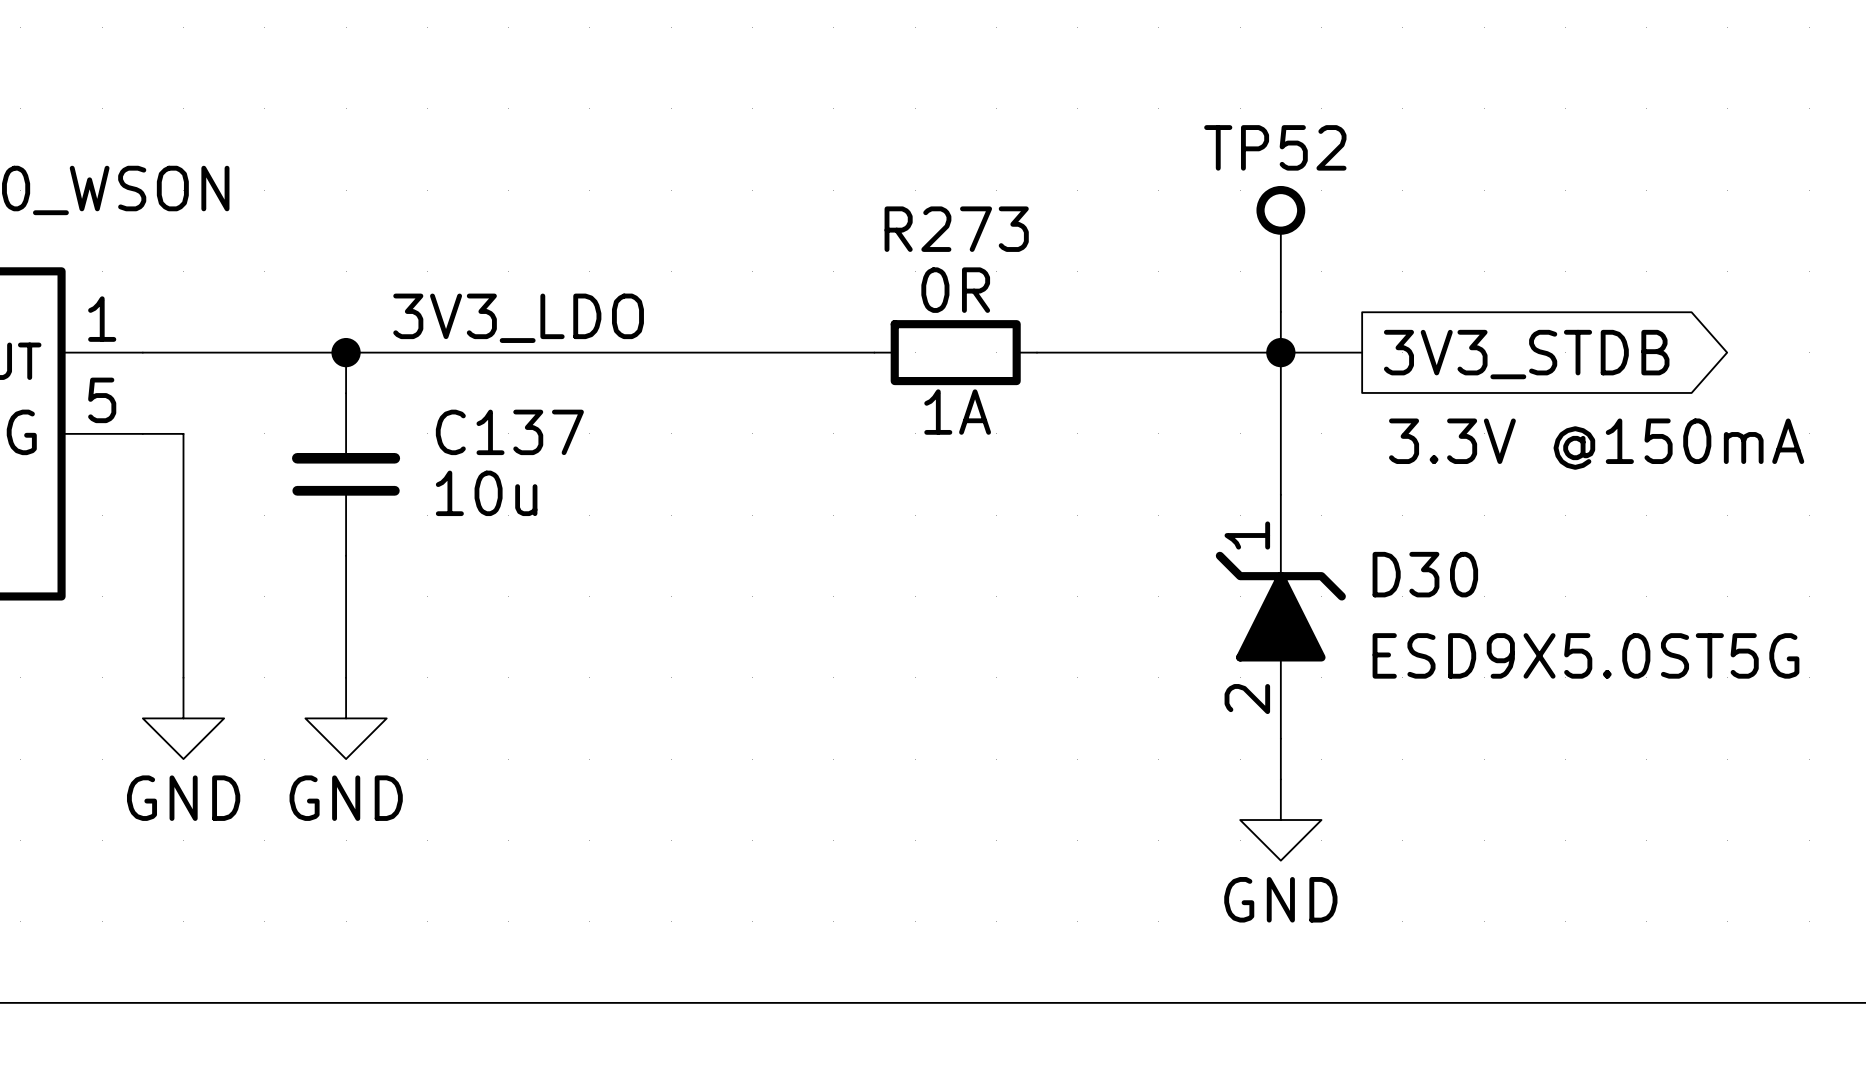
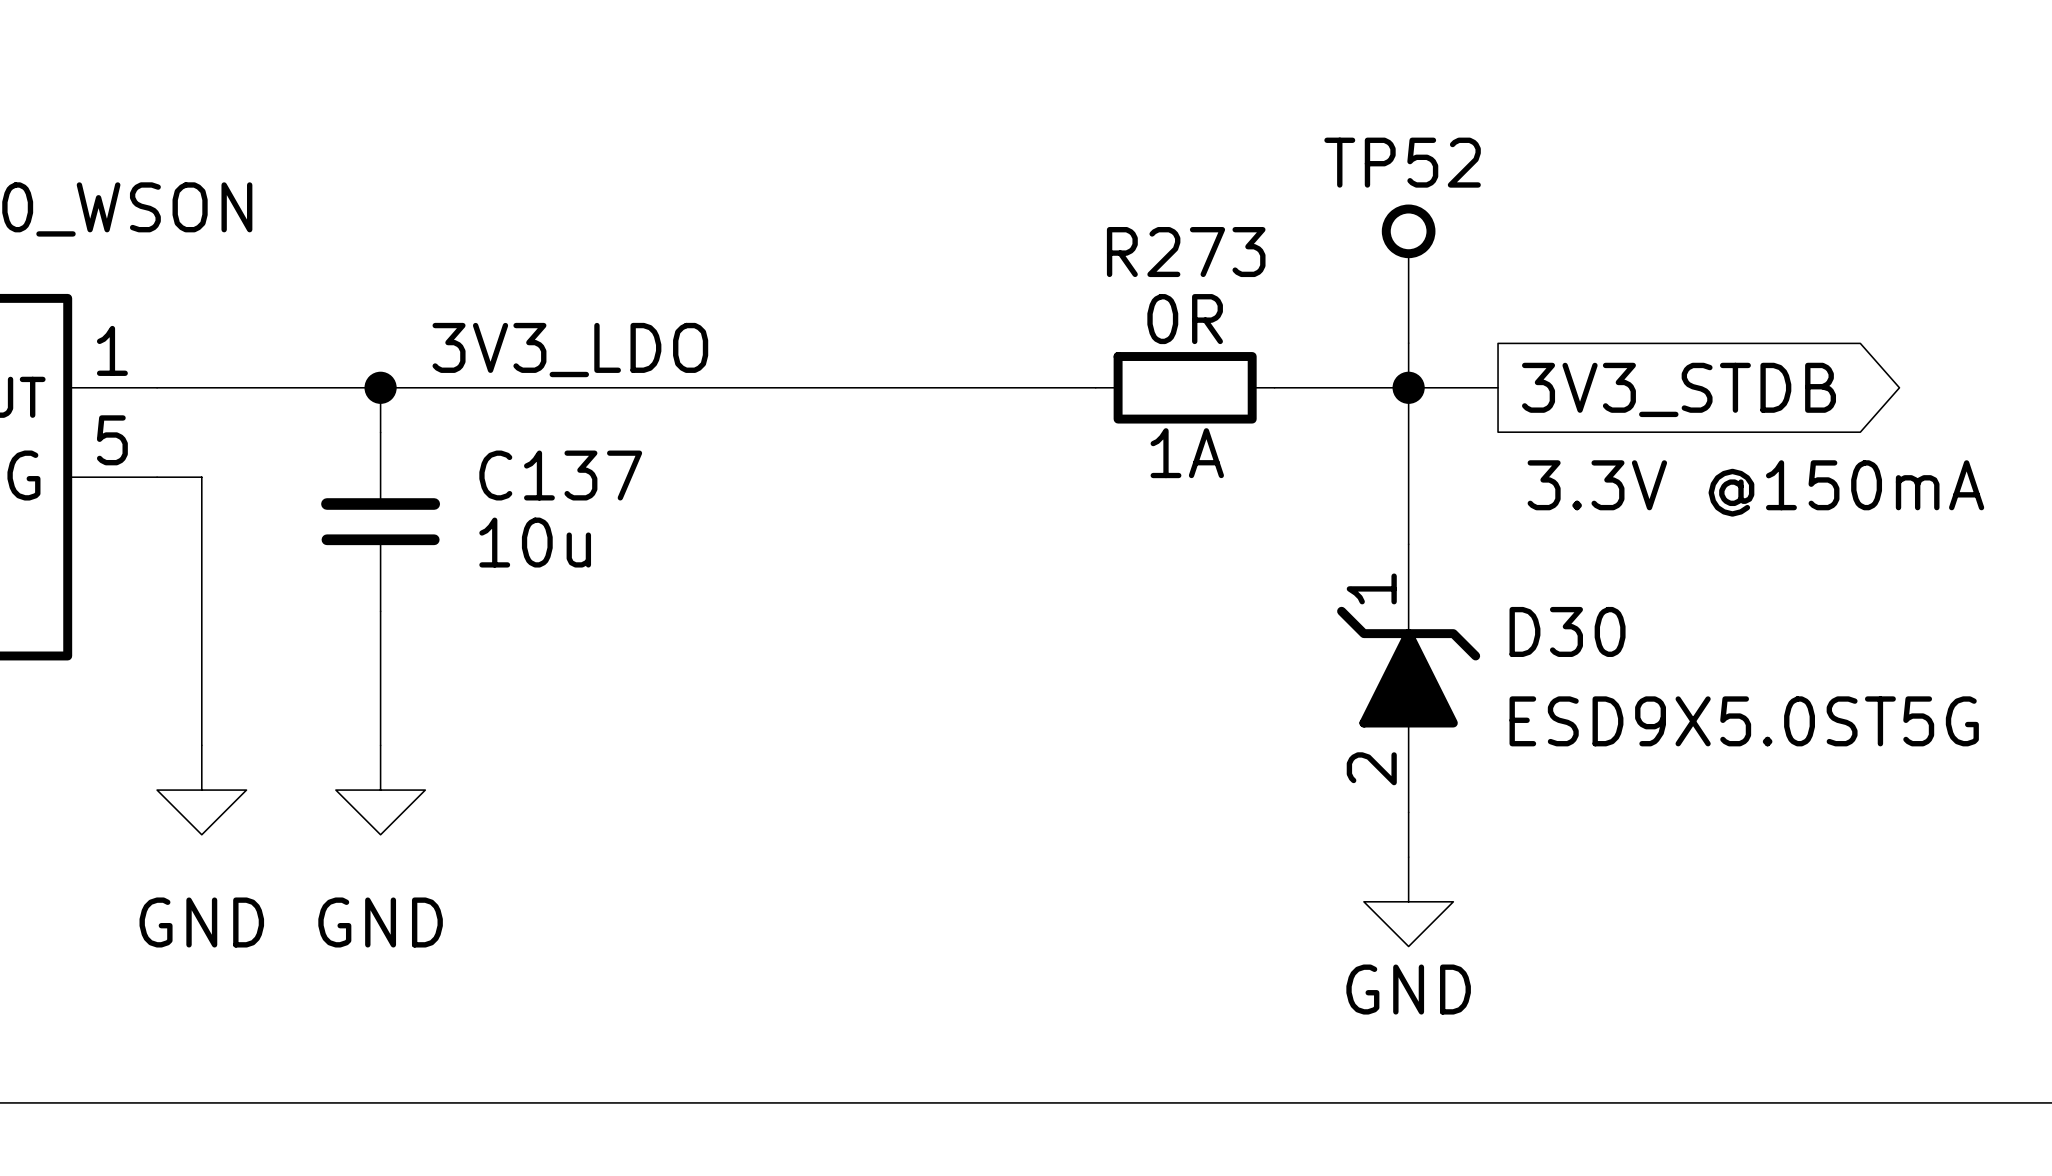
R273 position: (955, 352) -> (1185, 387)
wire: (1036, 352) (1158, 352) -> (961, 387) (1095, 387)
power symbol text position: GND (183, 798) -> GND (201, 922)
power symbol text position: GND (346, 798) -> GND (380, 922)

